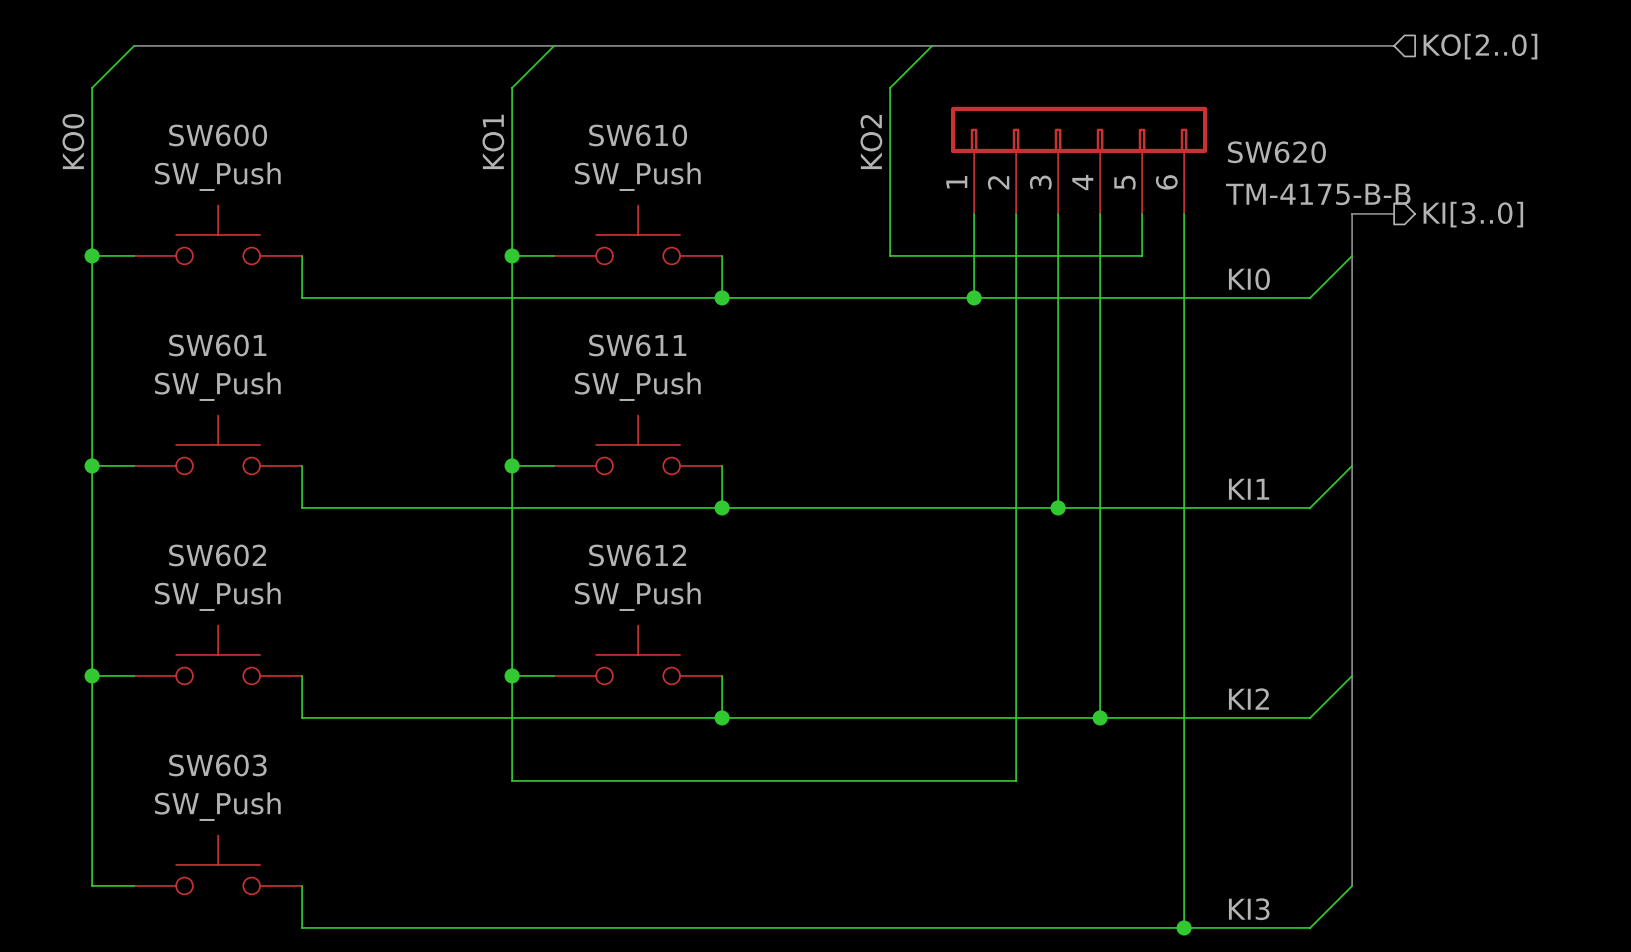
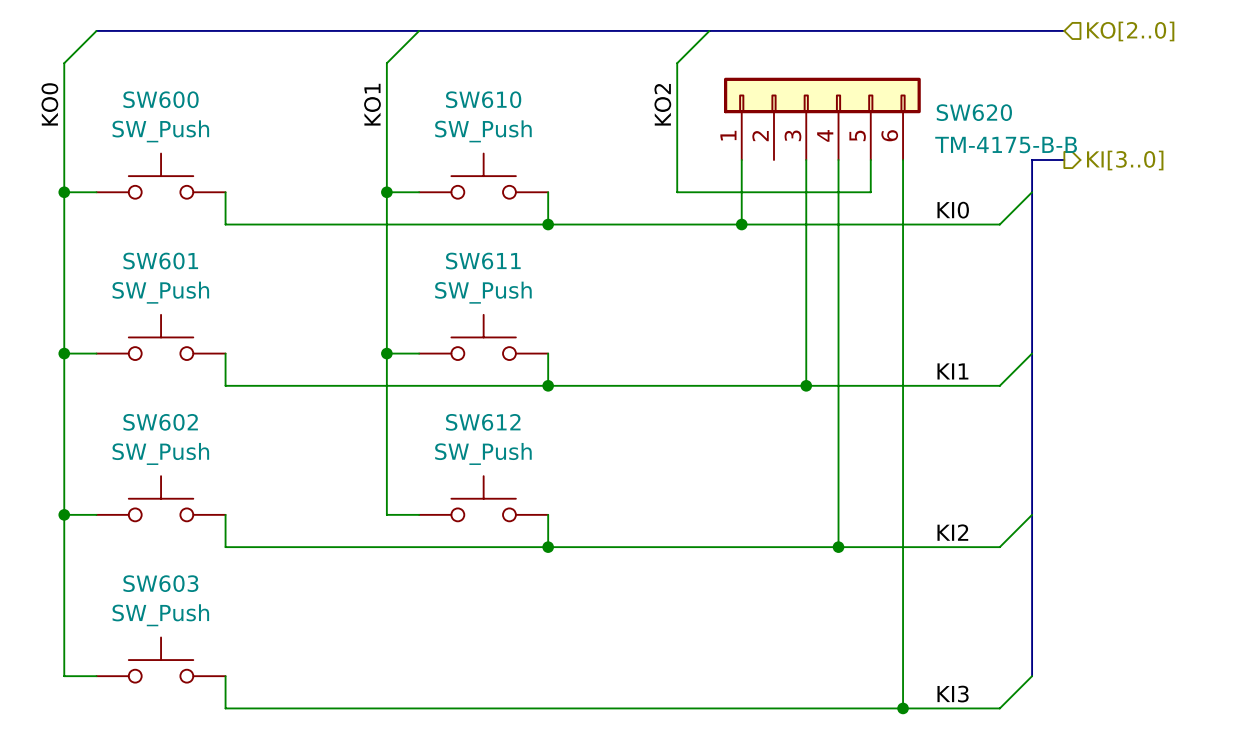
wire: (1016, 213) (1016, 780) (512, 780) (512, 675) -> none
junction: (512, 675) -> none

